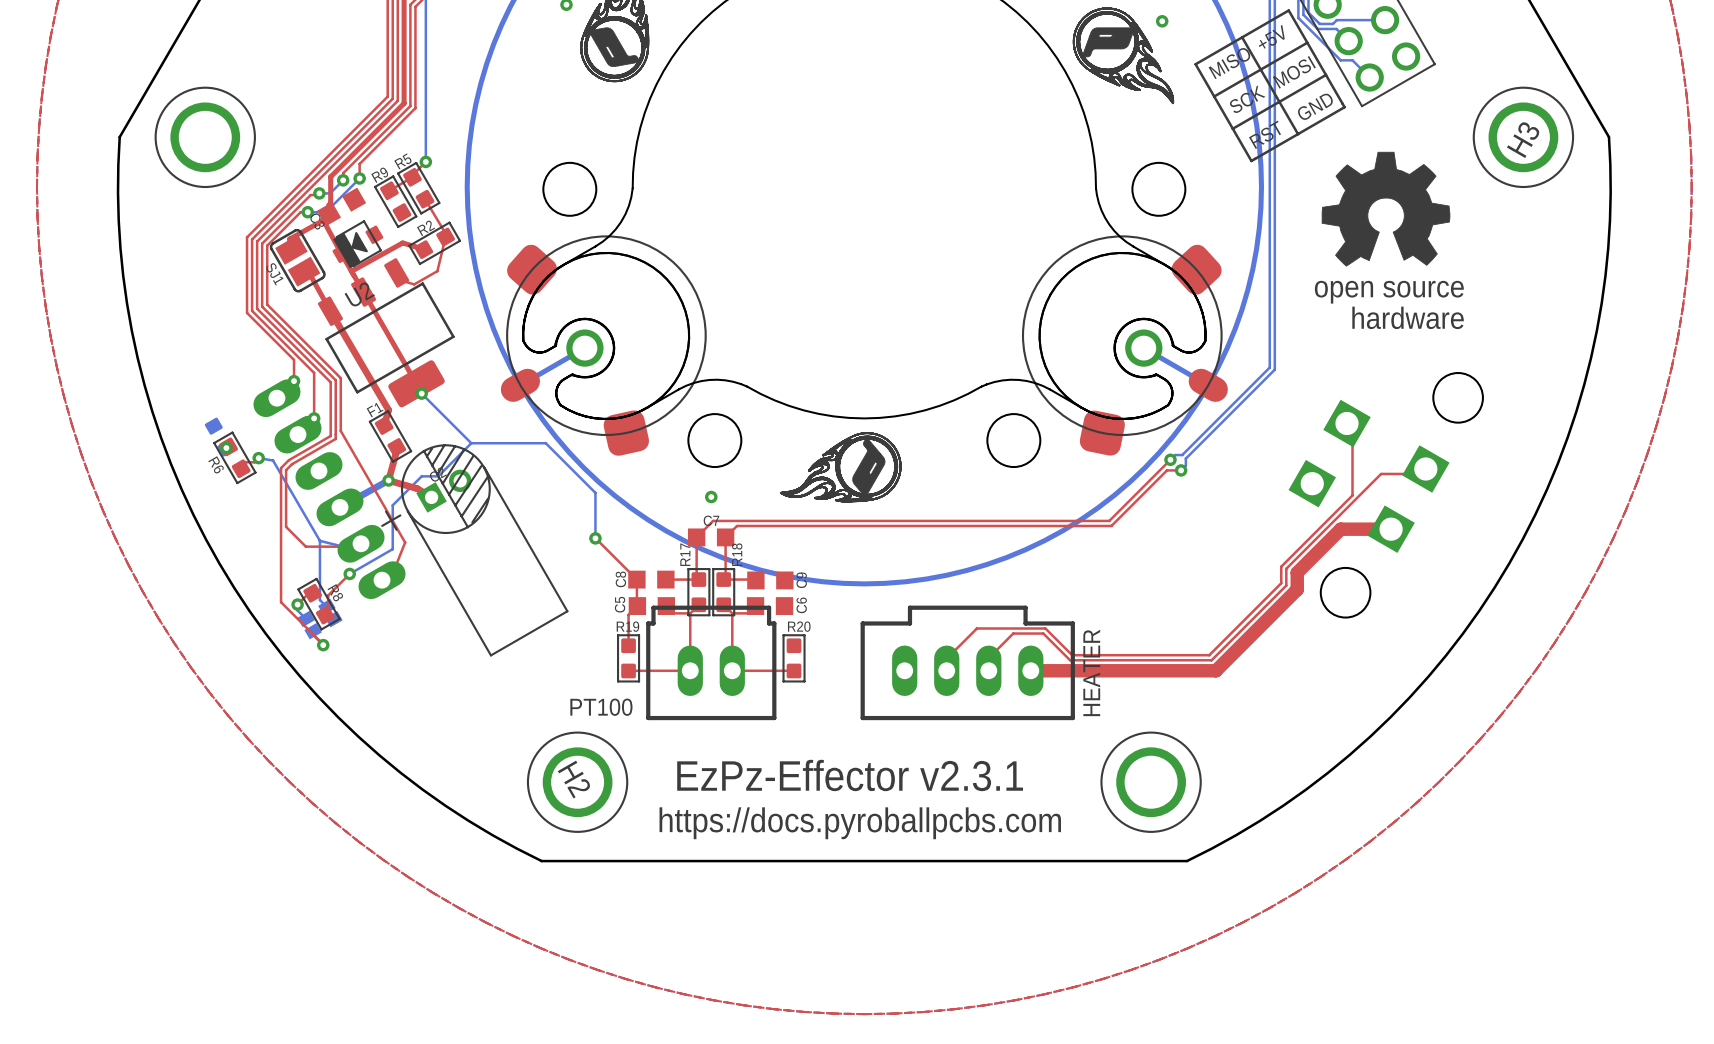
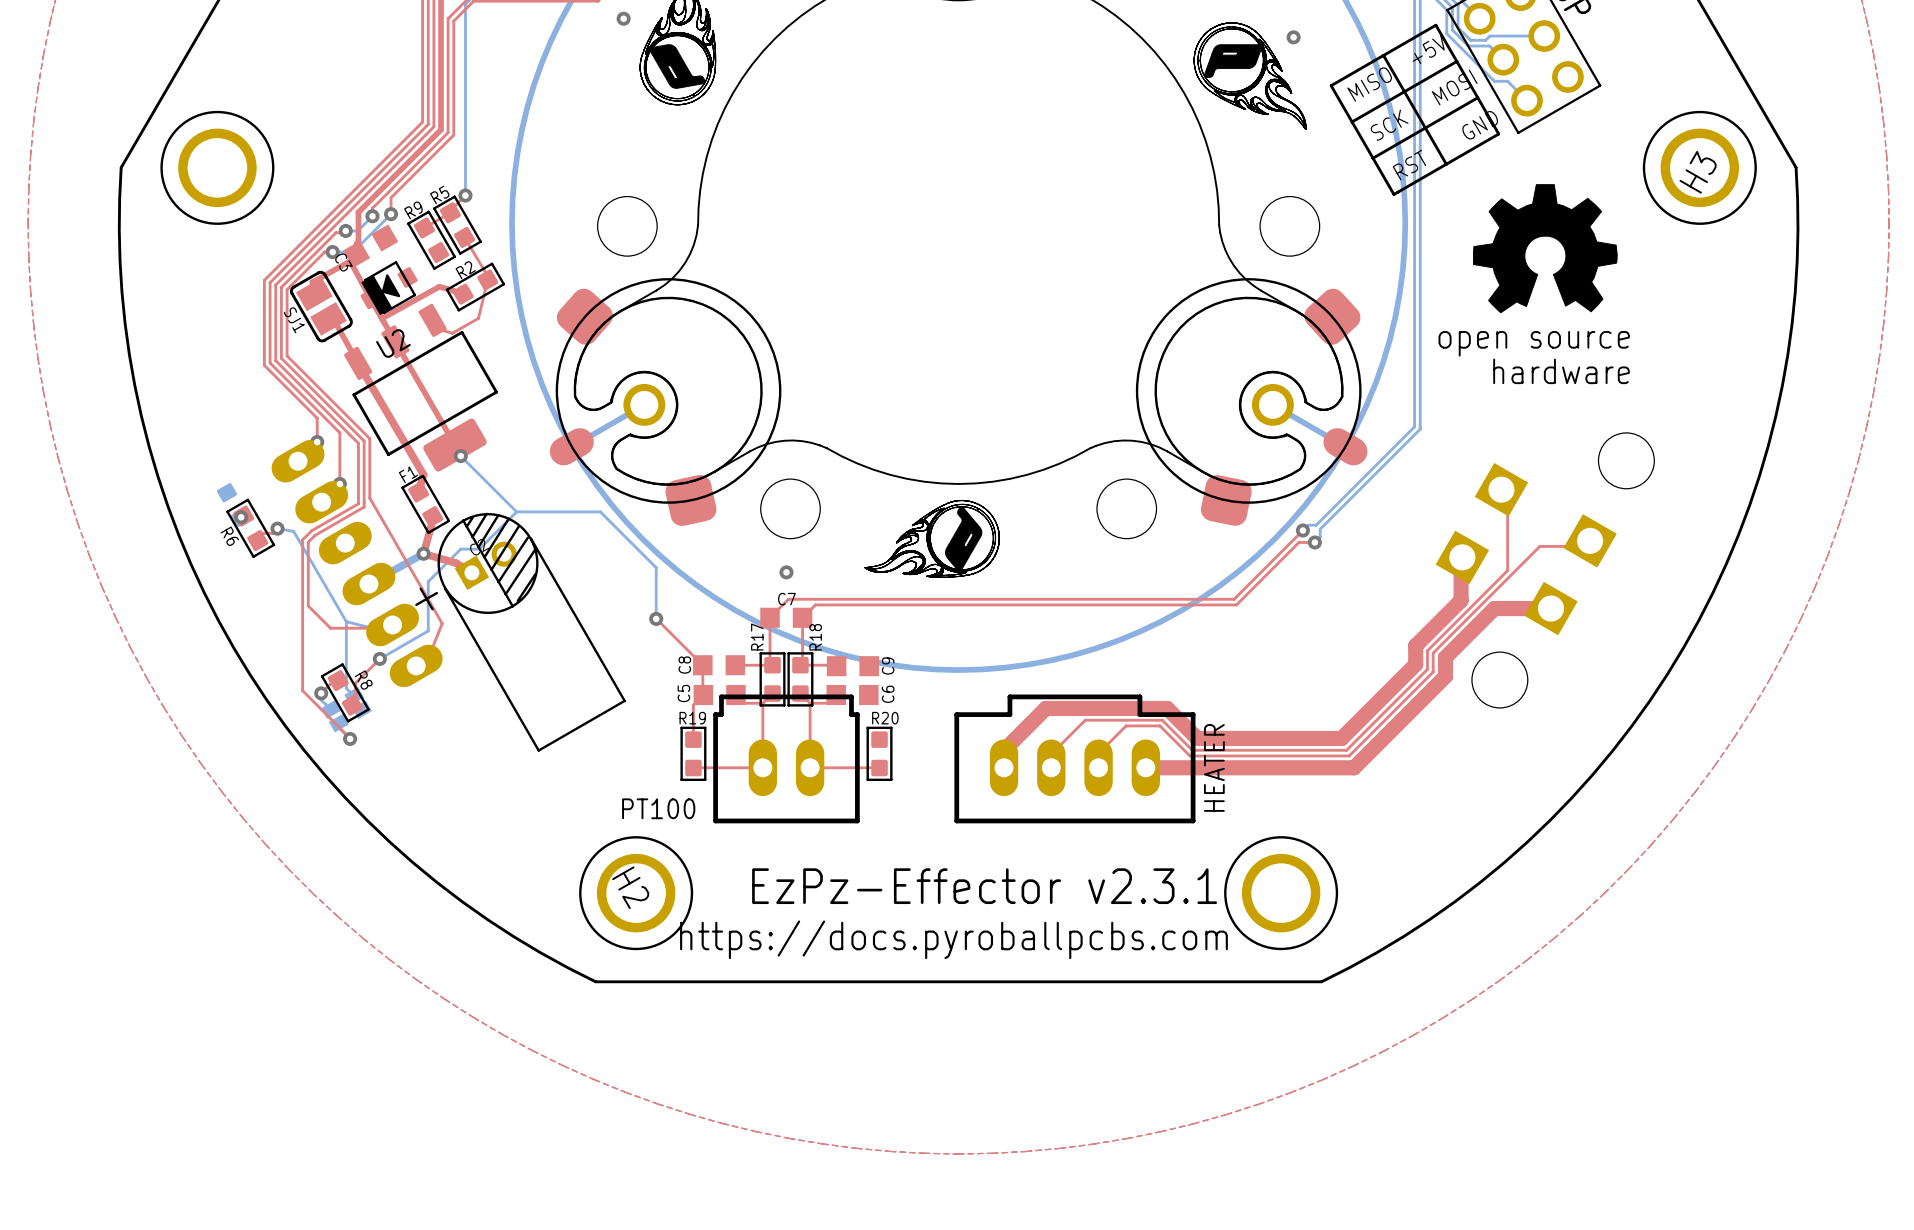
top track: none -> (1462, 557) (1461, 600) (1415, 645) (1415, 664) (1341, 738) (1197, 738) (1167, 708) (1045, 708) (1004, 750) (1004, 767)

